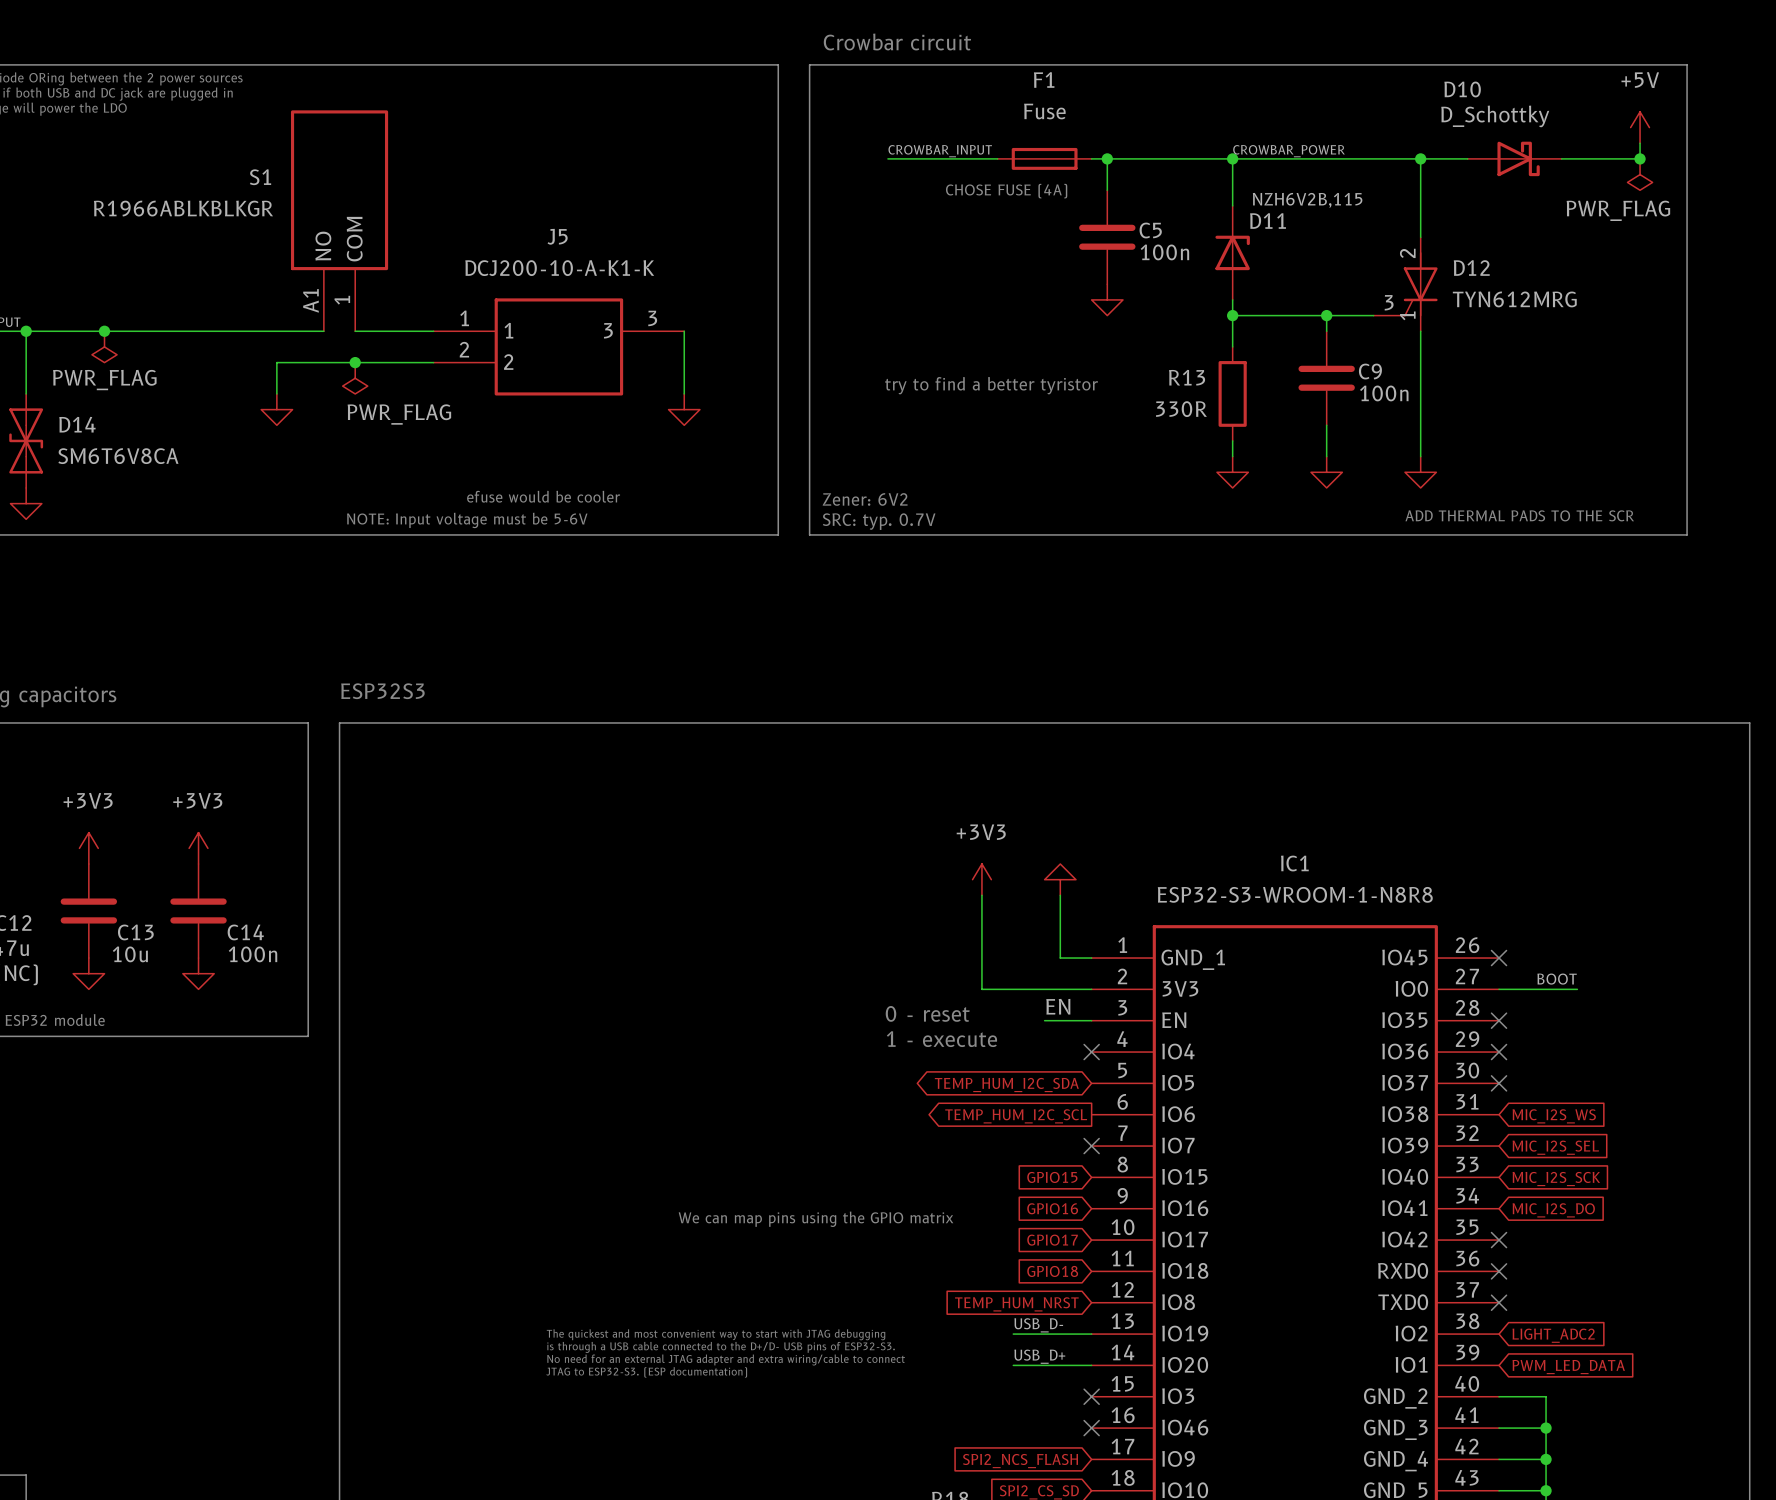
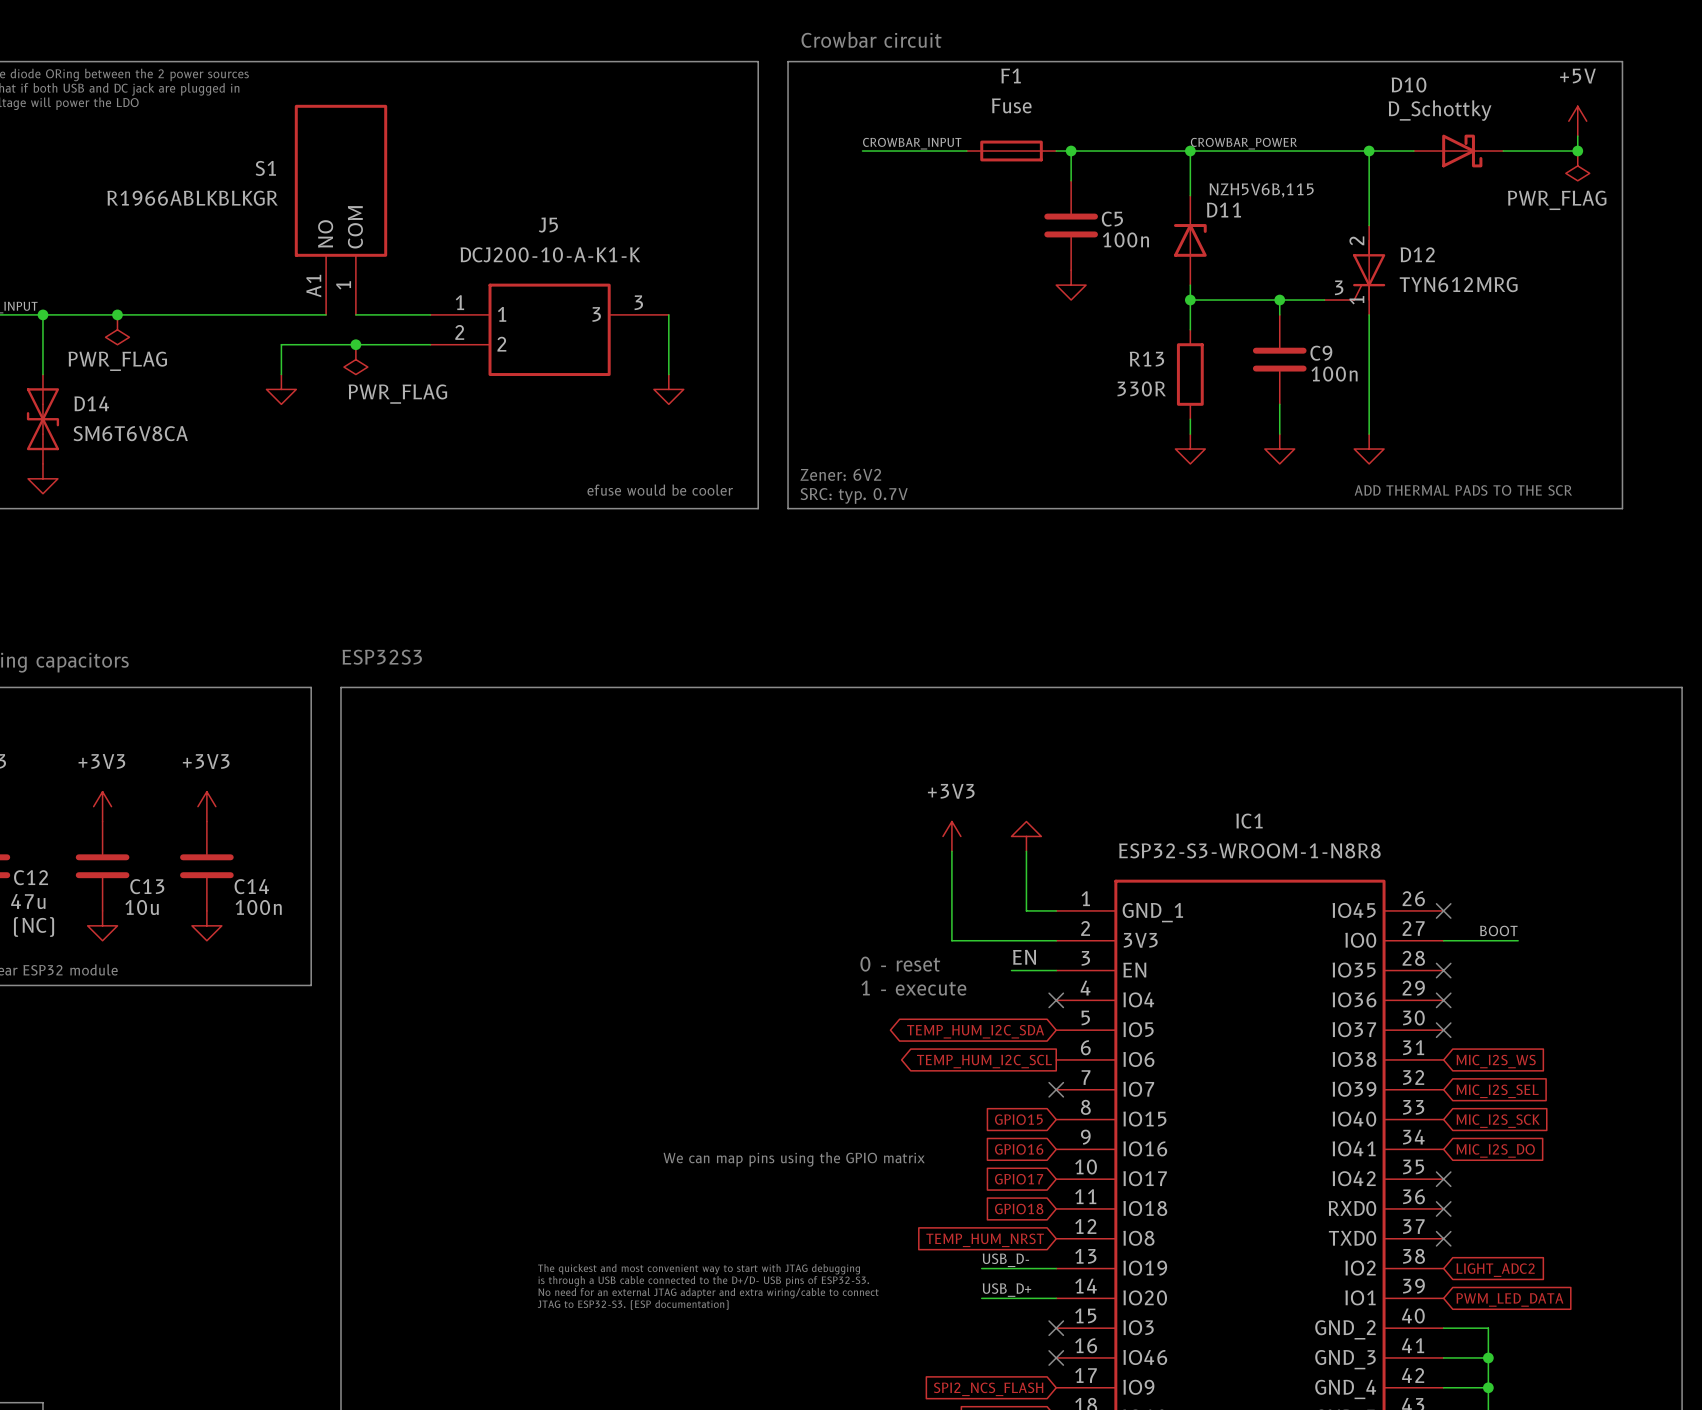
text: CHOSE FUSE (4A) (1006, 191) -> none
D11 value: NZH6V2B,115 (1307, 200) -> NZH5V6B,115 (1261, 190)
text: try to find a better tyristor (991, 385) -> none
text position: efuse would be cooler (543, 496) -> efuse would be cooler (660, 490)
text: NOTE: Input voltage must be 5-6V (467, 520) -> none

